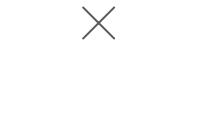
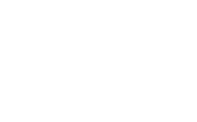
no-connect mark: (98, 22) -> none

